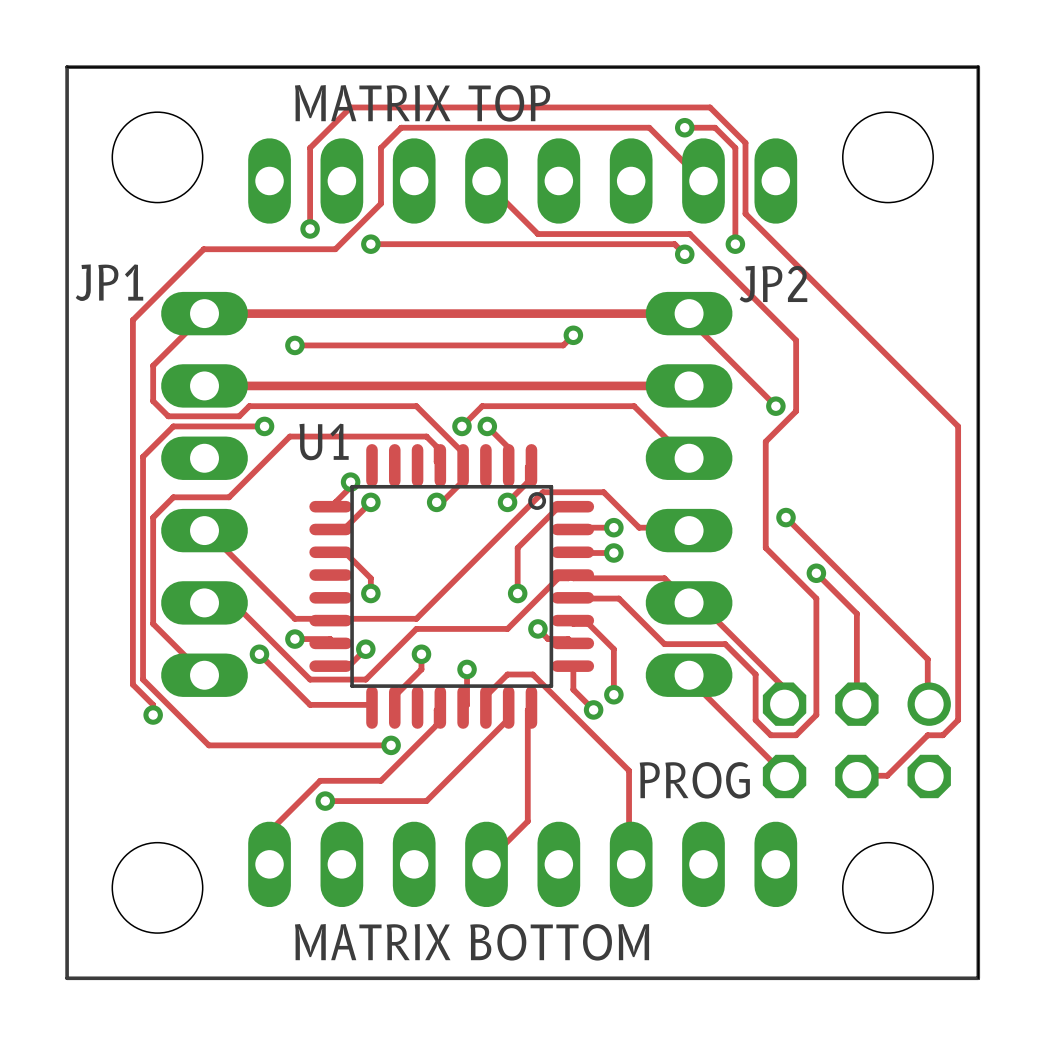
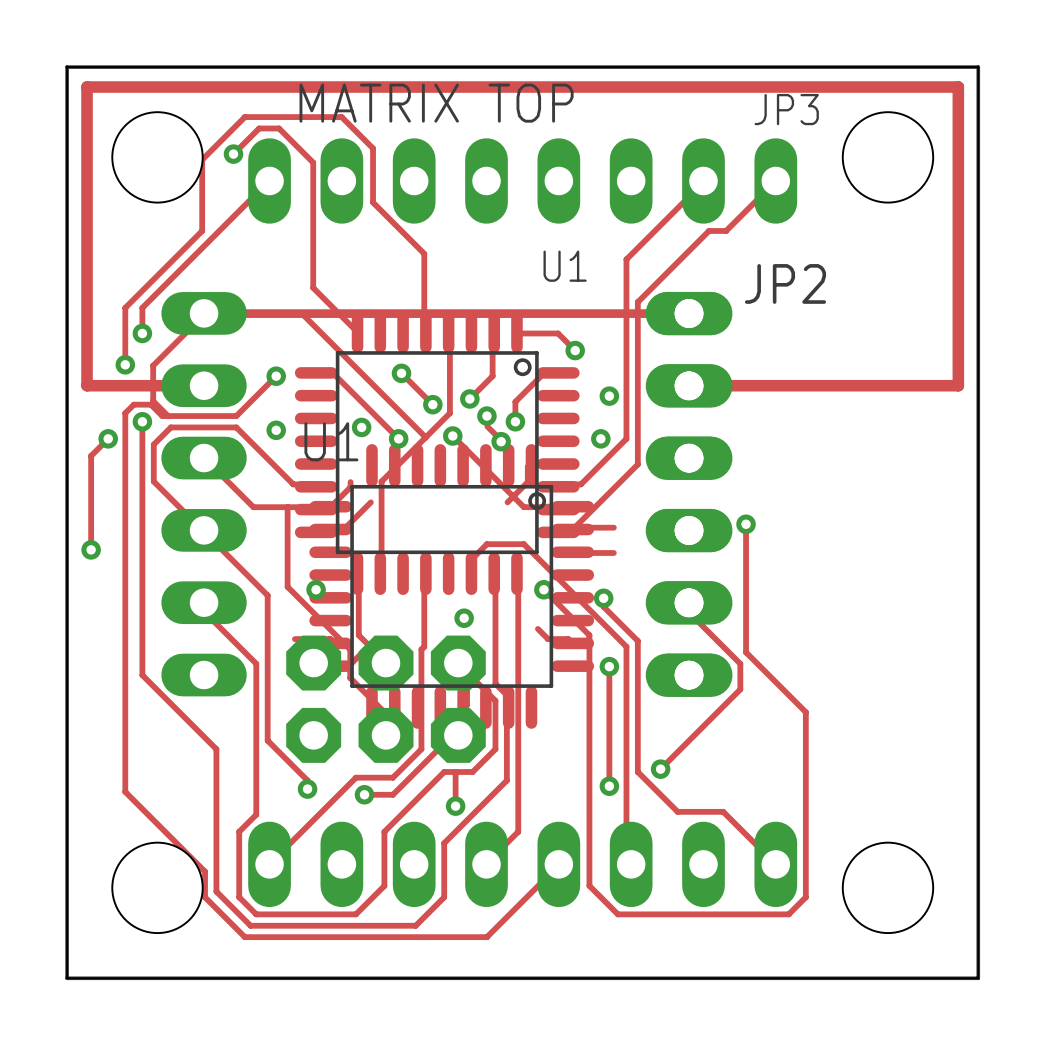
board edge: none -> (67, 67) (67, 978) (978, 978)
text: none -> JP3 (786, 109)
track: (684, 127) (715, 127) (735, 147) (735, 244) -> none
via: (684, 127) -> none
track: none -> (233, 154) (259, 128) (279, 128) (313, 162) (313, 287) (357, 331)
via: none -> (233, 154)
track: none -> (269, 180) (142, 307) (142, 333)
track: (486, 180) (537, 234) (689, 234) (796, 340) (796, 411) (765, 441) (765, 547) (816, 598) (816, 715) (796, 735) (770, 735) (755, 720) (755, 674) (725, 644) (664, 644) (618, 598) (572, 597) -> none
track: (703, 180) (649, 127) (401, 127) (380, 147) (380, 203) (335, 249) (203, 249) (132, 320) (132, 684) (153, 704) (153, 715) -> (703, 180) (626, 259) (626, 438) (580, 484) (560, 484) (558, 486)
track: none -> (775, 180) (726, 230) (709, 230) (637, 302) (637, 464) (572, 529) (560, 529) (558, 532)
track: (310, 228) (310, 147) (350, 107) (710, 107) (745, 142) (745, 213) (958, 426) (958, 720) (942, 735) (927, 735) (887, 775) (856, 776) -> none
via: (310, 228) -> none
track: (370, 244) (674, 244) (684, 254) -> none
via: (370, 244) -> none
via: (735, 244) -> none
via: (684, 254) -> none
text: none -> U1 (565, 266)
track: none -> (301, 313) (425, 437)
track: (689, 313) (684, 315) (775, 406) -> none
track: none -> (425, 331) (424, 330) (424, 253) (373, 202) (373, 148) (341, 117) (244, 117) (202, 159) (202, 230) (125, 307) (125, 364)
track: none -> (448, 331) (449, 413) (381, 481) (380, 573)
track: none -> (494, 331) (492, 333) (492, 376) (469, 398)
track: none -> (516, 331) (518, 333) (558, 333) (575, 350)
via: none -> (142, 333)
track: (573, 335) (563, 345) (294, 345) -> none
via position: (573, 335) -> (575, 350)
via: (294, 345) -> none
via: none -> (125, 364)
track: none -> (316, 372) (333, 373) (398, 438)
track: none -> (401, 373) (432, 404)
via: none -> (401, 373)
track: none -> (558, 373) (543, 373) (515, 401) (515, 421)
via: none -> (276, 376)
track: (204, 385) (689, 385) -> (204, 385) (87, 385) (87, 87) (958, 87) (958, 385) (688, 385)
via: none -> (609, 396)
via: none -> (469, 398)
via: none -> (432, 404)
via: (775, 406) -> none
track: none -> (168, 416) (162, 416) (150, 404) (133, 404) (125, 413) (125, 791) (205, 871) (205, 897) (244, 937) (486, 937) (558, 864)
track: (236, 416) (239, 416) (249, 406) (416, 406) (461, 451) (461, 482) (441, 502) (436, 502) -> (236, 416) (276, 376)
via: none -> (486, 416)
track: none -> (142, 421) (142, 675) (216, 749) (216, 891) (250, 925) (415, 925) (444, 897) (444, 843) (506, 780) (506, 695) (495, 683) (494, 573)
via: none -> (142, 421)
via: none -> (515, 421)
track: (264, 426) (173, 426) (143, 456) (143, 679) (208, 745) (391, 745) -> none
via position: (264, 426) -> (276, 430)
track: (461, 426) (482, 406) (634, 406) (684, 456) (689, 458) -> none
via position: (461, 426) -> (452, 435)
via: (487, 426) -> none
via: none -> (361, 427)
track: none -> (452, 435) (523, 507) (558, 507) (558, 509)
track: none -> (108, 438) (91, 455) (91, 549)
via: none -> (108, 438)
via: none -> (398, 438)
via: none -> (600, 438)
via: none -> (501, 441)
part: none -> (437, 452)
track: none -> (204, 458) (253, 507) (316, 507) (316, 509)
track: (440, 465) (436, 461) (436, 446) (426, 436) (289, 436) (229, 497) (173, 497) (153, 517) (153, 623) (204, 675) -> none
via: (350, 482) -> none
track: none -> (316, 486) (316, 484) (293, 484) (236, 427) (170, 427) (153, 444) (153, 481) (267, 595) (267, 740) (307, 780) (307, 789)
JP1: (204, 494) -> none
part: none -> (204, 494)
via: (370, 502) -> none
via: (436, 502) -> none
via: (507, 502) -> none
track: (572, 506) (558, 507) (517, 547) (517, 593) -> none
track: none -> (287, 507) (287, 586) (350, 649) (350, 678) (384, 712) (384, 734) (386, 735)
track: (786, 517) (927, 659) (929, 704) -> none
via position: (786, 517) -> (746, 524)
track: none -> (746, 524) (746, 652) (805, 712) (805, 897) (788, 914) (617, 914) (589, 885) (589, 635) (543, 589)
via: (613, 527) -> none
track: (204, 530) (294, 618) (330, 618) (330, 620) (335, 618) (416, 618) (542, 492) (603, 492) (639, 527) (684, 527) (689, 530) -> none
via: none -> (91, 549)
track: (330, 552) (345, 553) (370, 578) (370, 593) -> none
via: (613, 553) -> none
track: none -> (357, 573) (358, 635) (386, 663)
track: (816, 573) (856, 613) (856, 704) -> none
via: (816, 573) -> none
via: none -> (316, 589)
via: none -> (543, 589)
via: (370, 593) -> none
via: (517, 593) -> none
track: none -> (603, 598) (603, 606) (637, 641) (637, 771) (677, 811) (723, 811) (775, 864)
via: none -> (603, 598)
track: (204, 602) (234, 603) (310, 679) (365, 679) (416, 628) (507, 628) (558, 578) (568, 578) (572, 575) (573, 578) (664, 578) (689, 603) (699, 603) (780, 684) (780, 699) (784, 704) -> (204, 602) (205, 612) (256, 663) (256, 814) (239, 831) (239, 897) (256, 914) (355, 914) (384, 885) (384, 831) (444, 771) (472, 771) (495, 749) (495, 700) (458, 663)
track: none -> (688, 602) (689, 612) (740, 663) (740, 689) (660, 769)
via: none -> (464, 618)
track: (572, 620) (573, 623) (588, 623) (613, 649) (613, 694) -> none
via: (537, 628) -> none
via: (294, 639) -> none
via: (365, 649) -> none
track: (259, 654) (310, 704) (370, 704) (371, 707) -> none
via: (259, 654) -> none
track: (421, 654) (421, 669) (396, 694) (394, 707) -> none
via: (421, 654) -> none
track: (572, 666) (573, 689) (593, 709) -> none
track: none -> (609, 666) (609, 786)
via: none -> (609, 666)
via: (467, 669) -> none
track: (689, 675) (689, 679) (786, 775) (784, 776) -> none
via: (613, 694) -> none
part: none -> (386, 699)
track: (440, 707) (436, 709) (436, 725) (380, 780) (320, 780) (269, 831) (269, 864) -> (425, 573) (424, 575) (424, 646) (421, 649) (421, 749) (392, 777) (355, 777) (269, 864)
track: (485, 707) (487, 694) (507, 674) (532, 674) (629, 770) (629, 861) (631, 864) -> (471, 573) (472, 558) (486, 544) (523, 544) (626, 646) (626, 860) (631, 864)
track: (508, 707) (507, 720) (426, 801) (325, 801) -> none
track: (531, 707) (527, 709) (527, 821) (486, 864) -> (516, 573) (518, 831) (486, 864)
via: (593, 709) -> none
via: (153, 715) -> none
track: none -> (458, 735) (455, 737) (449, 737) (392, 794) (364, 794)
PROG: (856, 740) -> none
via: (391, 745) -> none
via: none -> (660, 769)
track: none -> (455, 771) (455, 806)
via: none -> (609, 786)
via: none -> (364, 794)
via position: (325, 801) -> (307, 789)
via: none -> (455, 806)
text: MATRIX BOTTOM (472, 942) -> none

